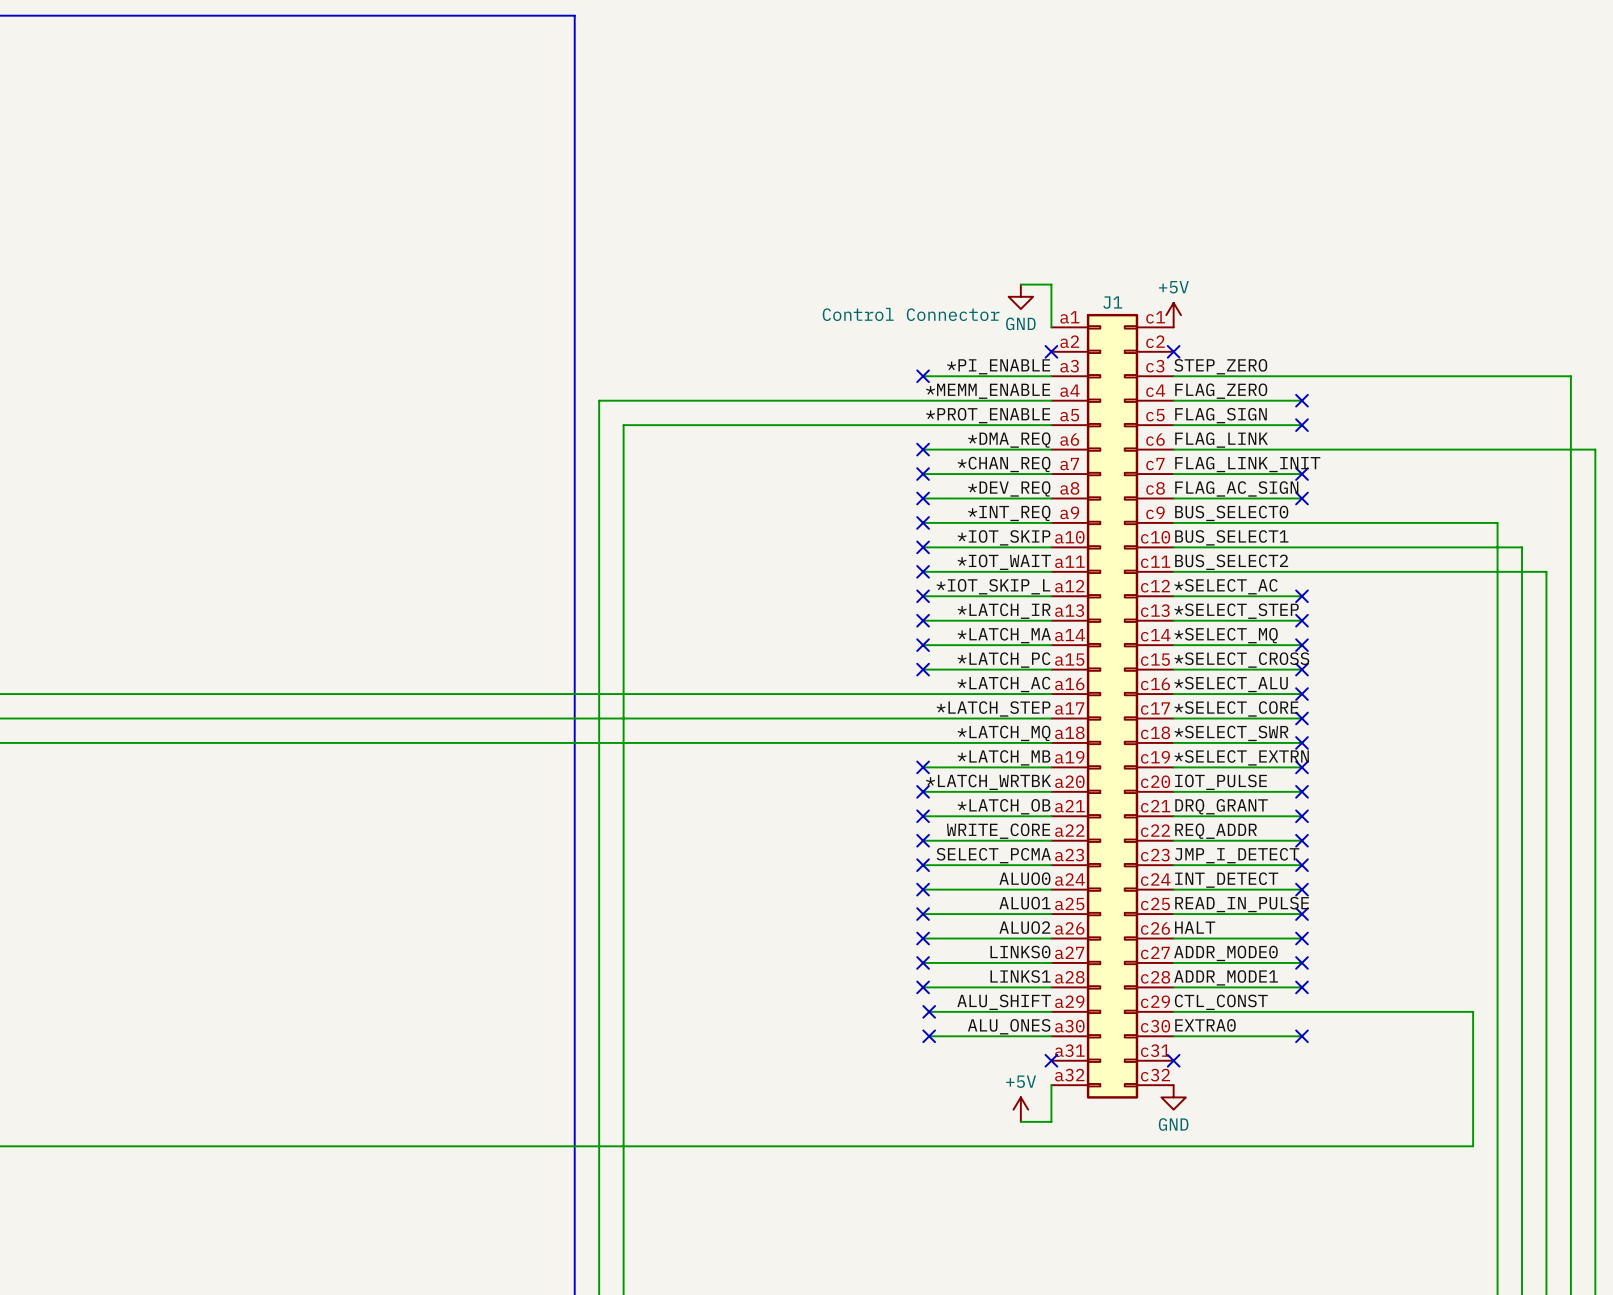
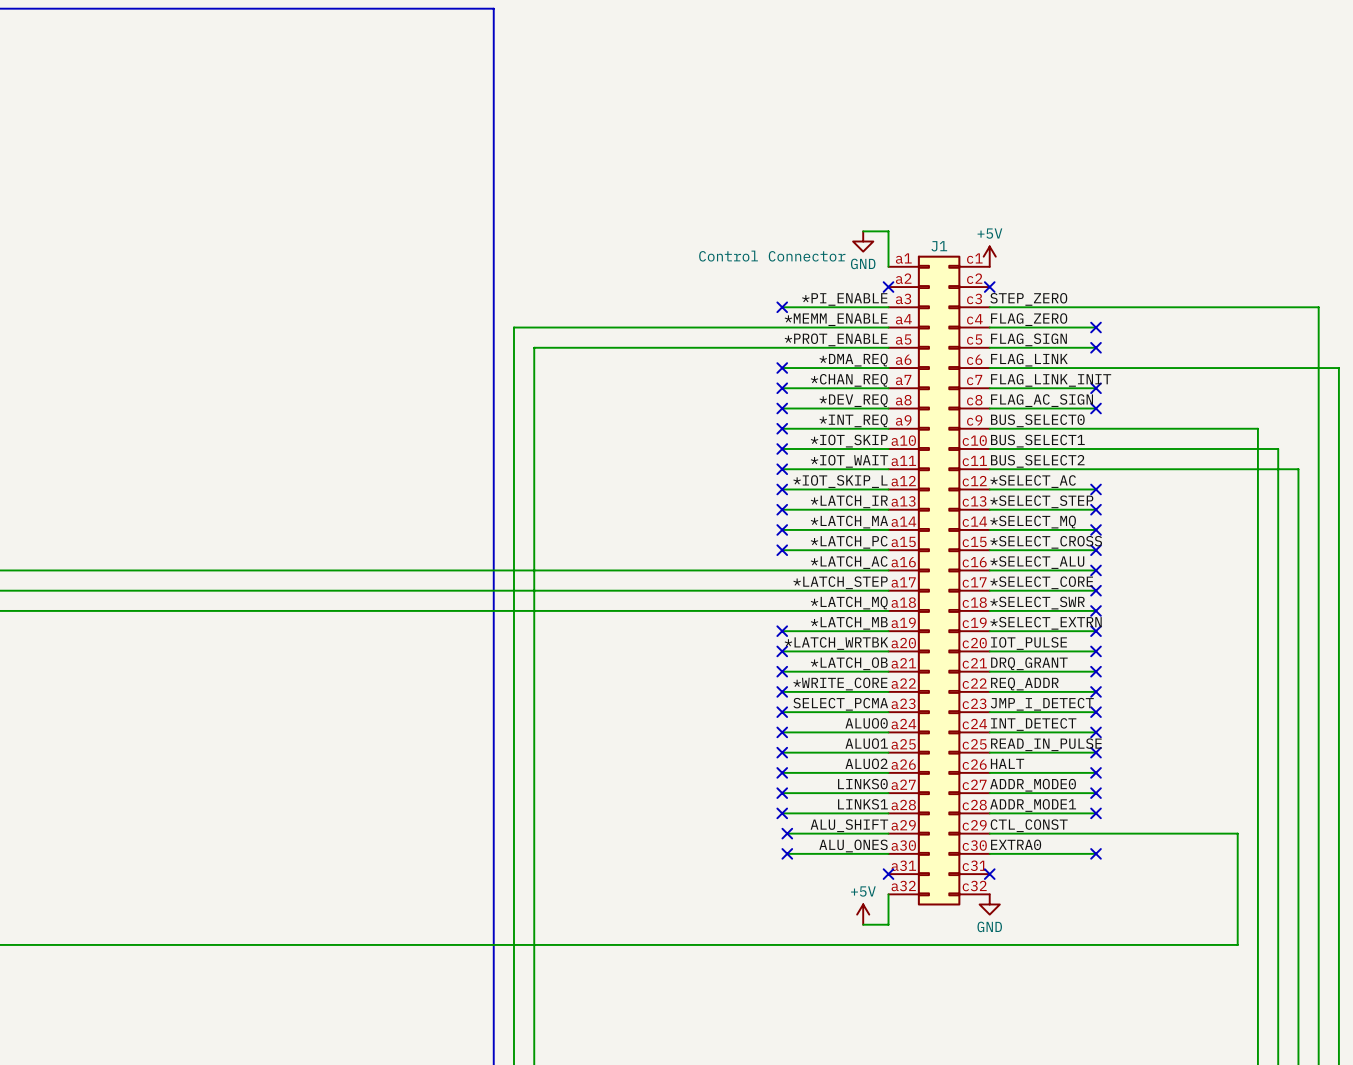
label: WRITE_CORE (998, 831) -> *WRITE_CORE (840, 684)

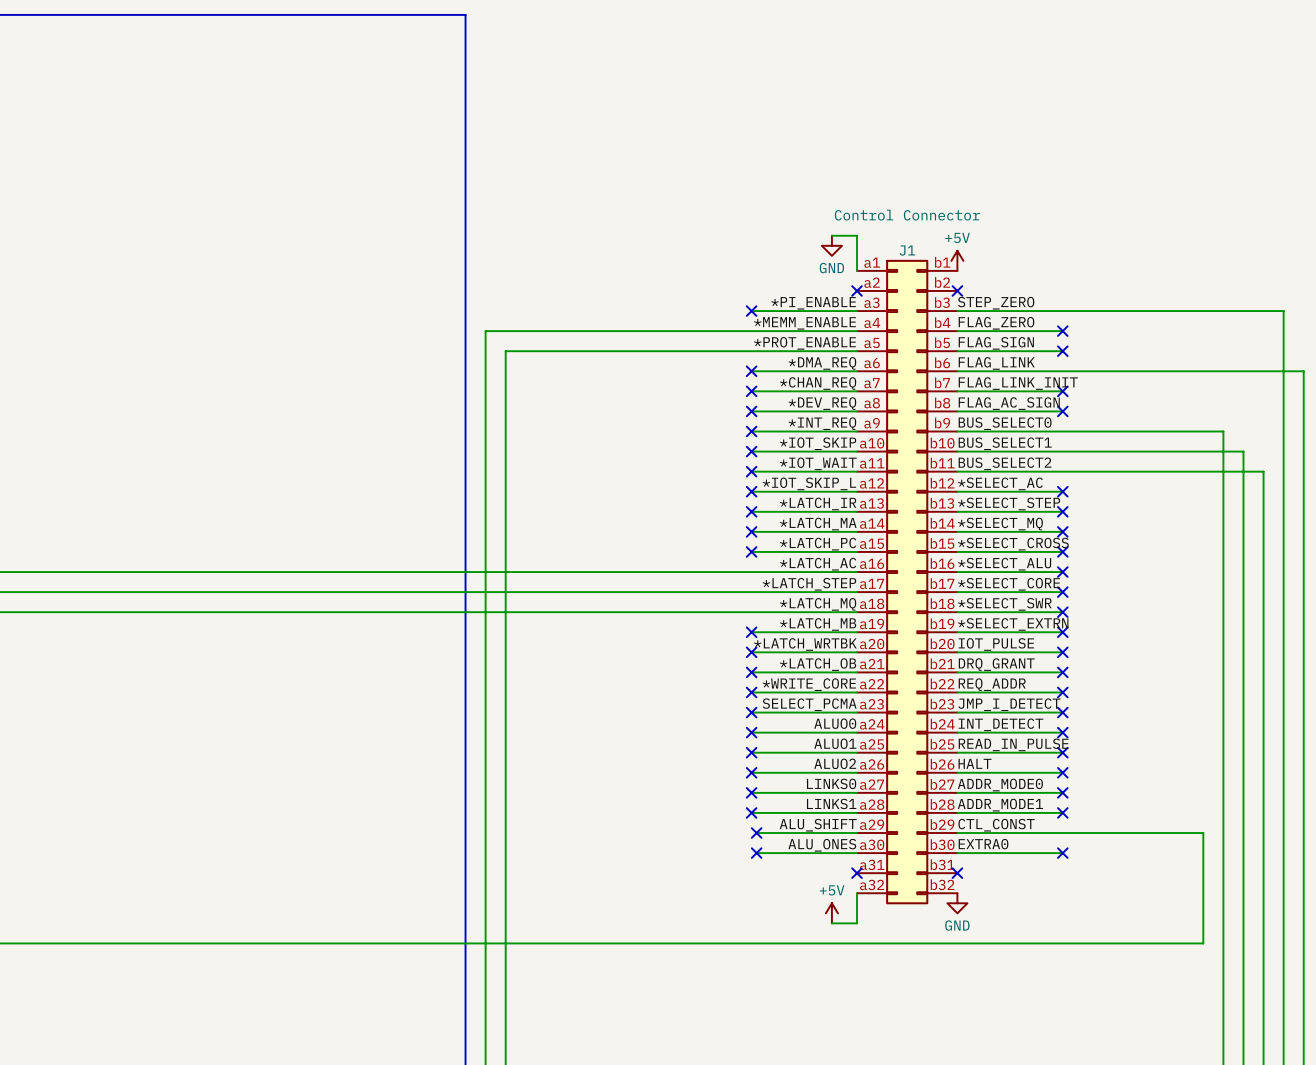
J1 symbol: [888, 255, 990, 906] -> [857, 259, 958, 905]
J1 value position: Control Connector (772, 256) -> Control Connector (907, 215)

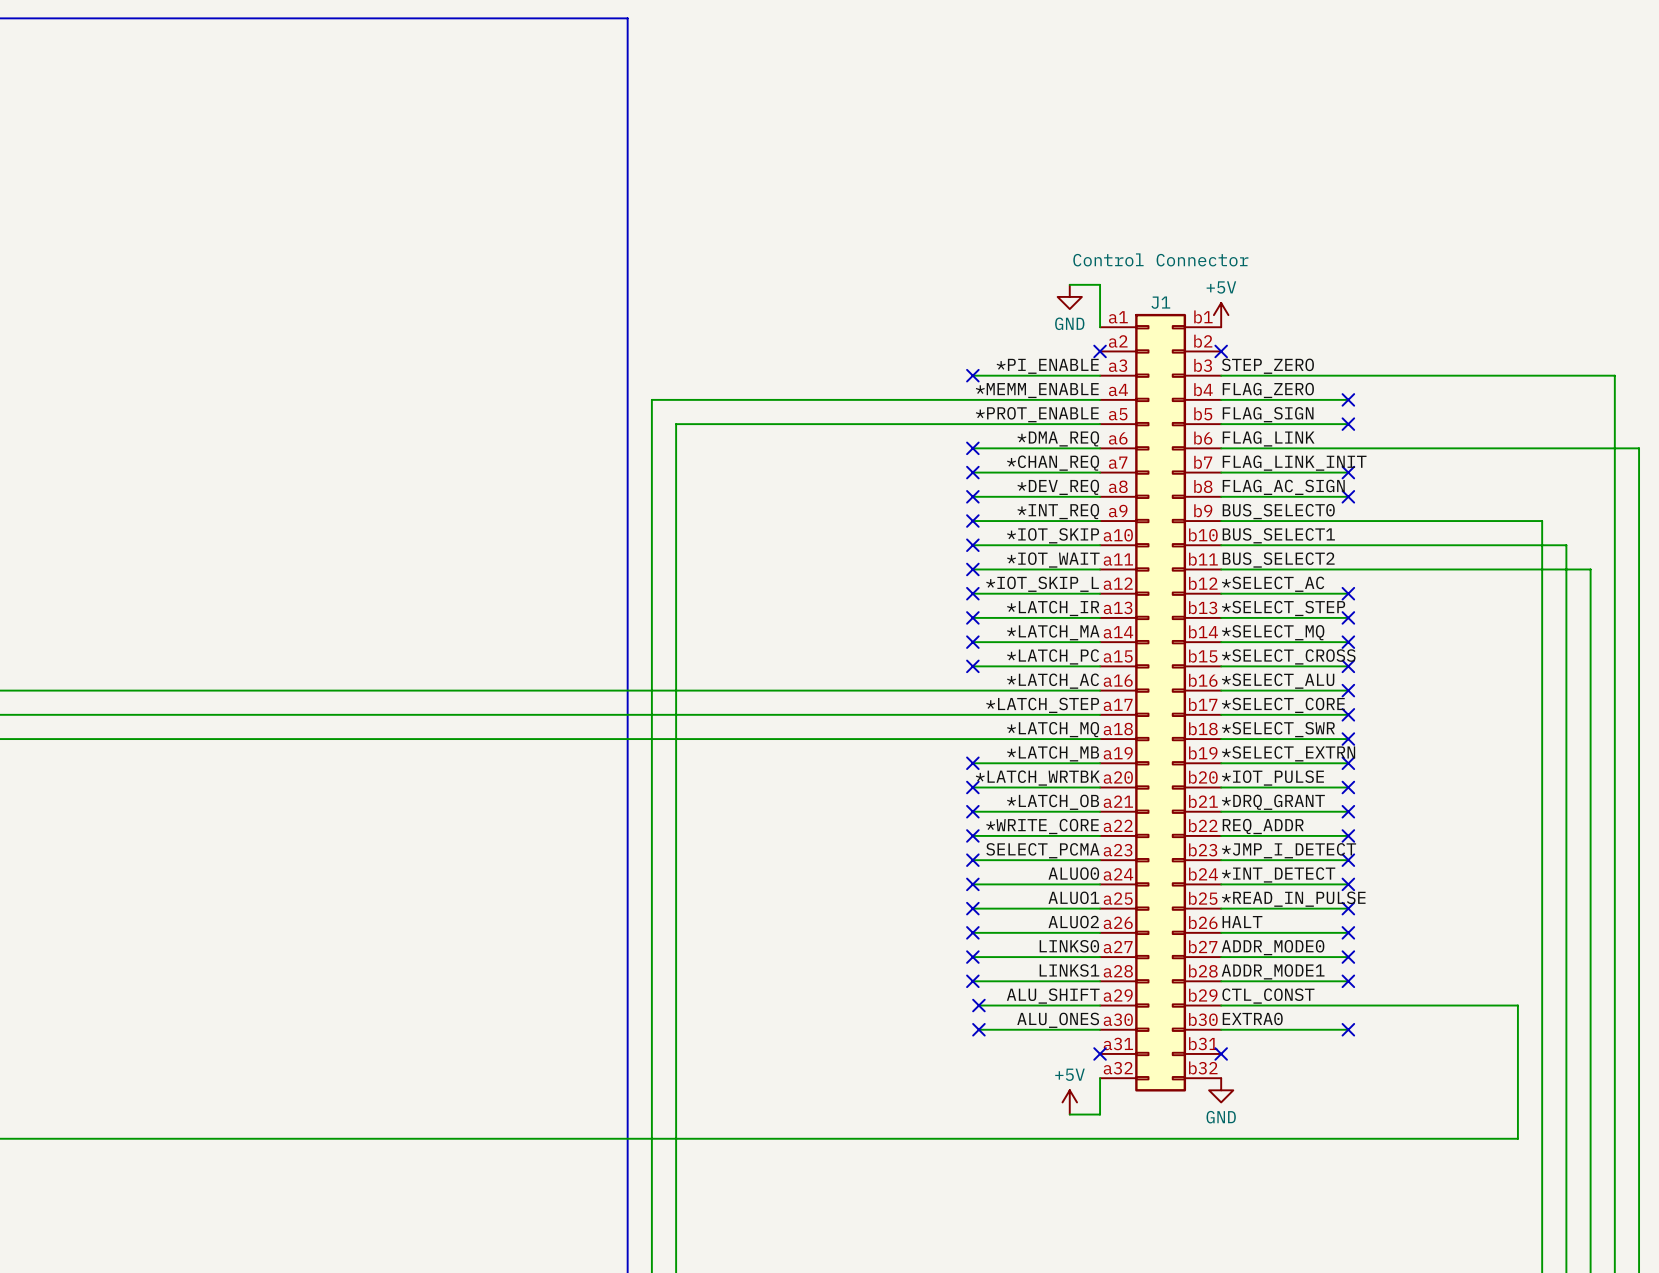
label: IOT_PULSE (996, 644) -> *IOT_PULSE (1272, 778)
label: DRQ_GRANT (996, 664) -> *DRQ_GRANT (1273, 802)
label: JMP_I_DETECT (1009, 704) -> *JMP_I_DETECT (1289, 850)
label: INT_DETECT (1000, 724) -> *INT_DETECT (1278, 874)
label: READ_IN_PULSE (1013, 744) -> *READ_IN_PULSE (1293, 899)

